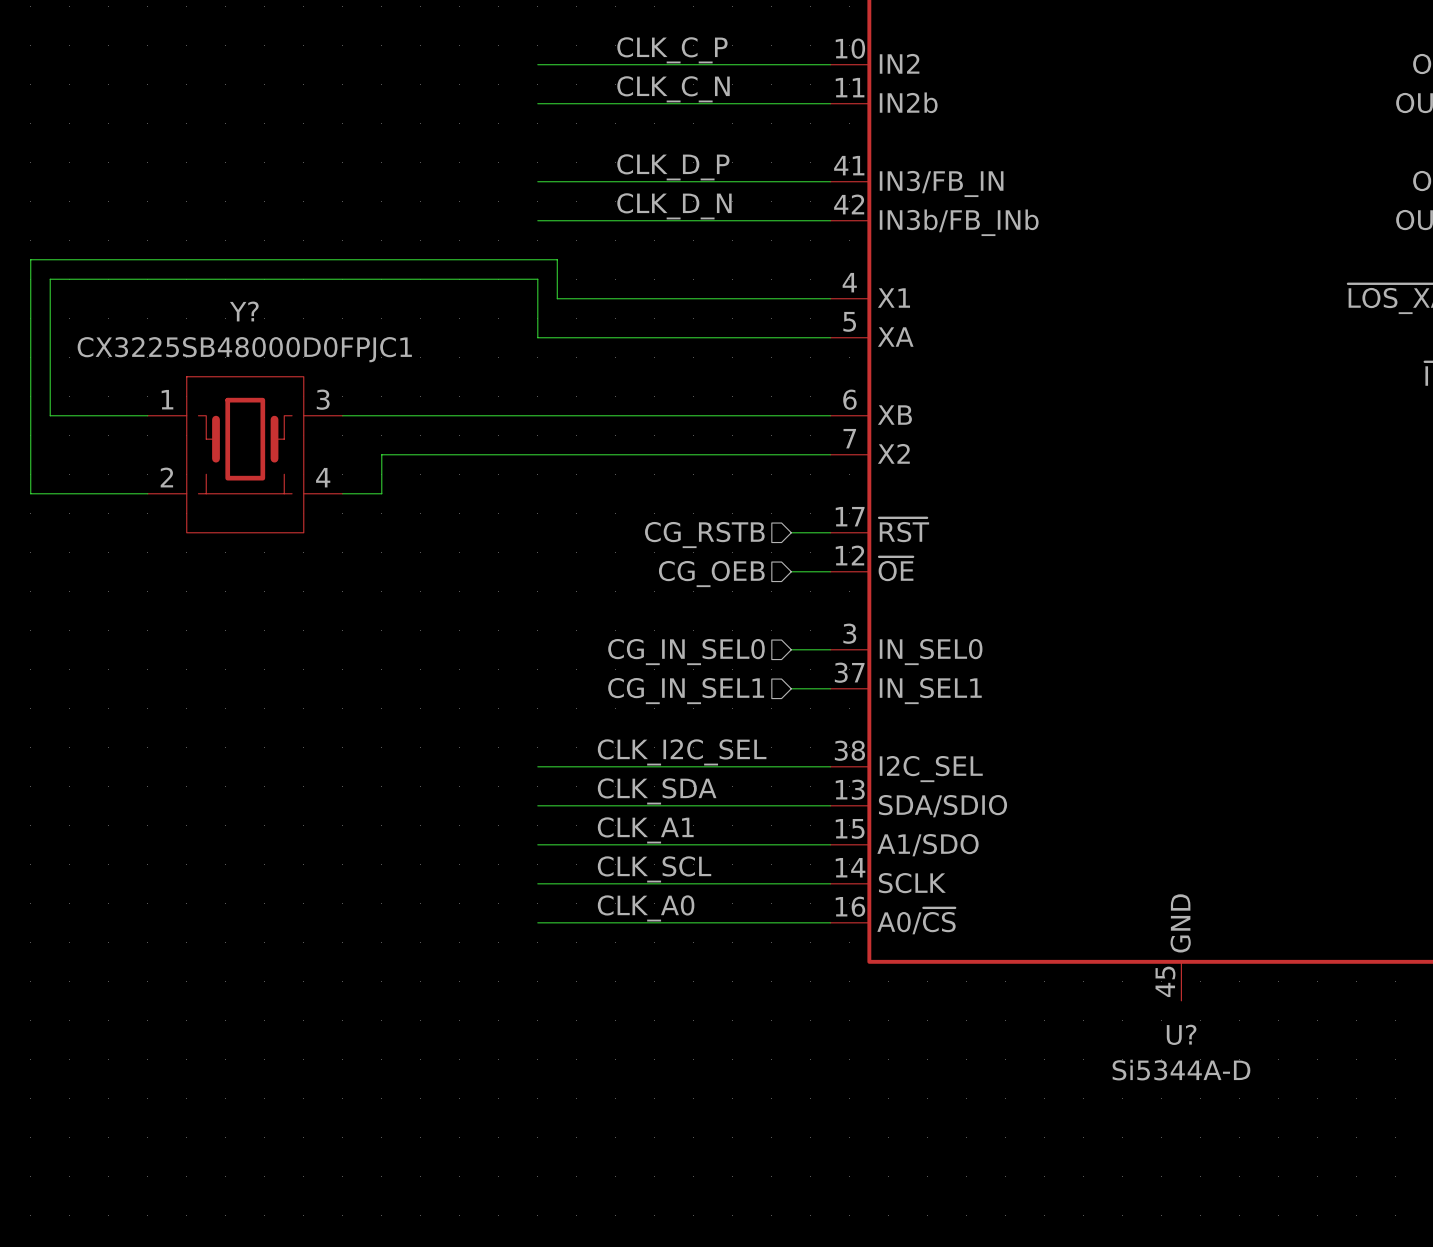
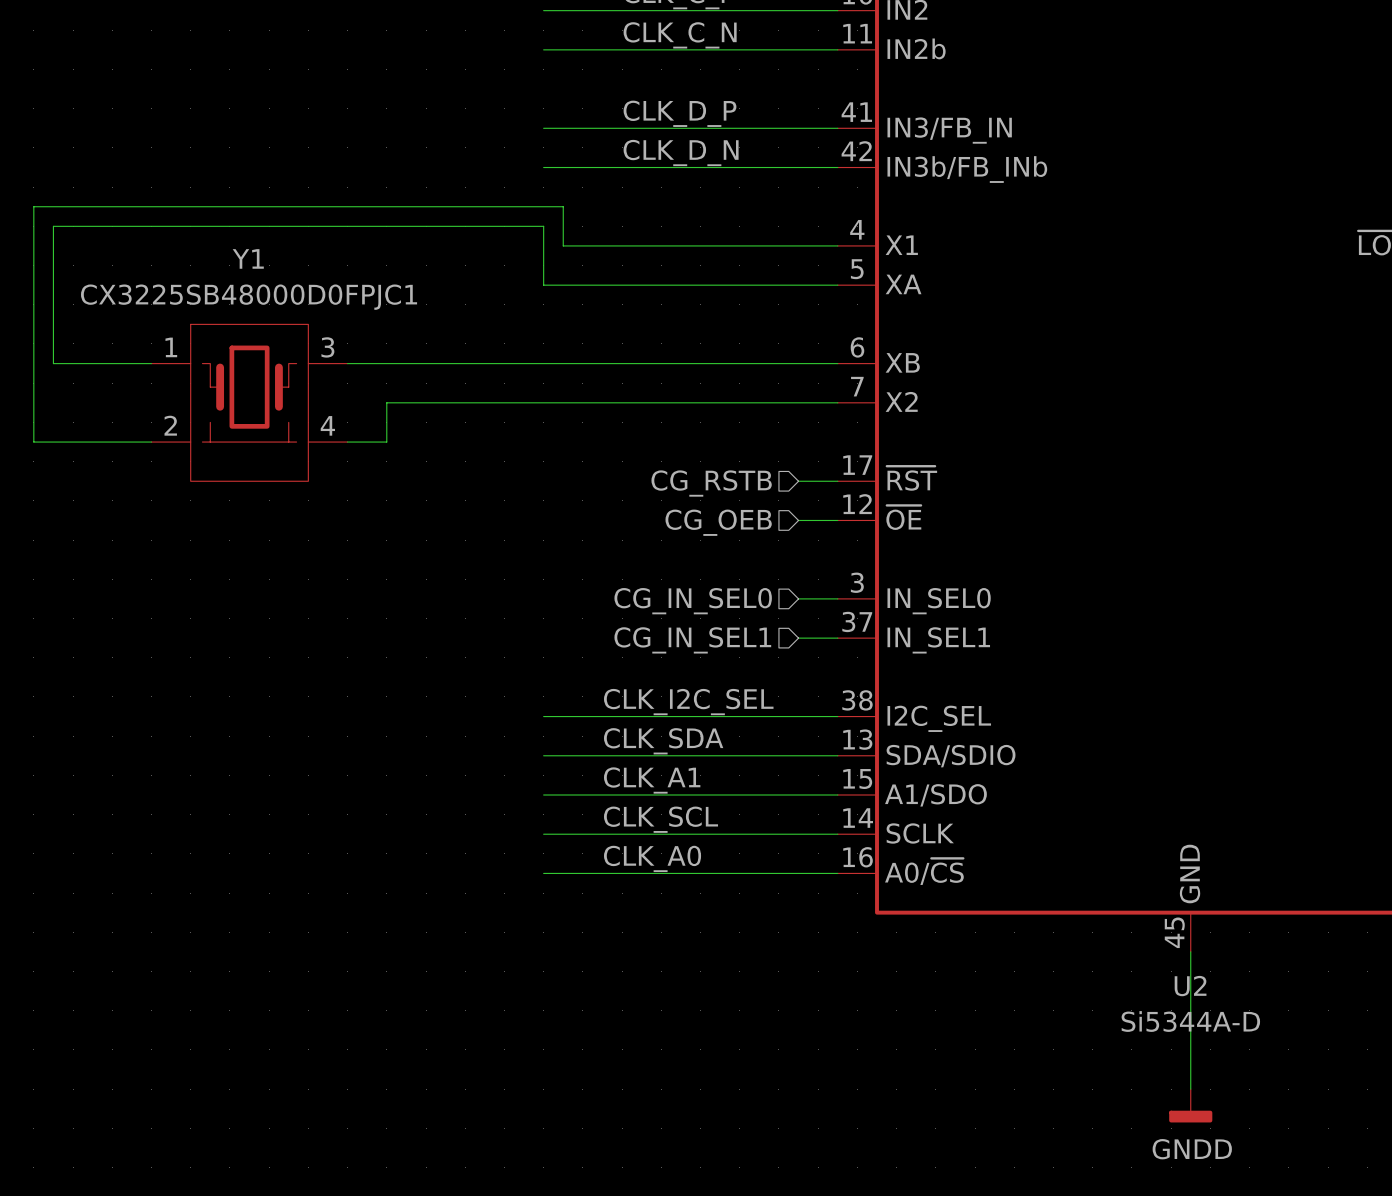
Y? name: Y? (244, 311) -> Y1 (248, 258)
wire: none -> (1190, 951) (1190, 1089)
U? name: U? (1181, 1034) -> U2 (1190, 986)
power symbol: none -> GNDD (1190, 1105)

